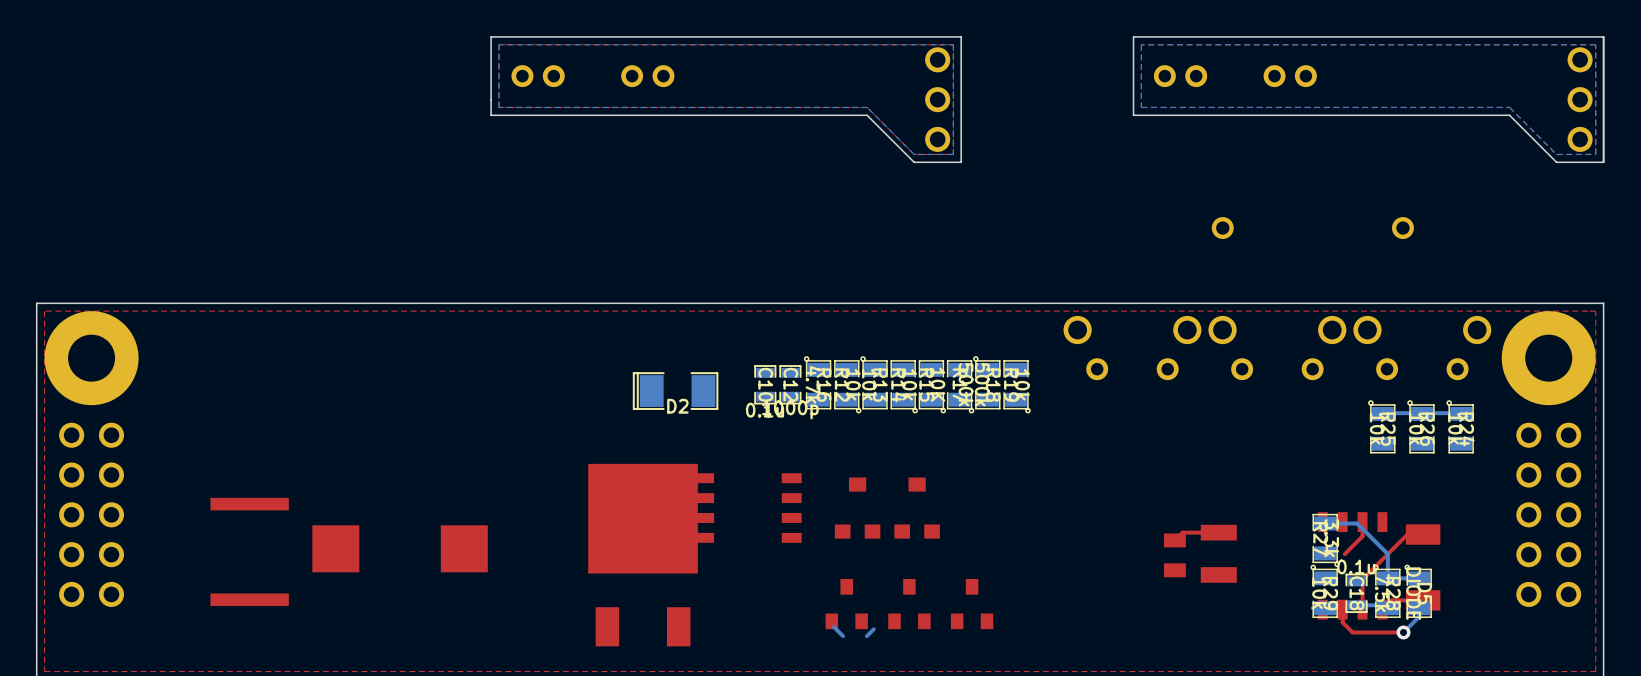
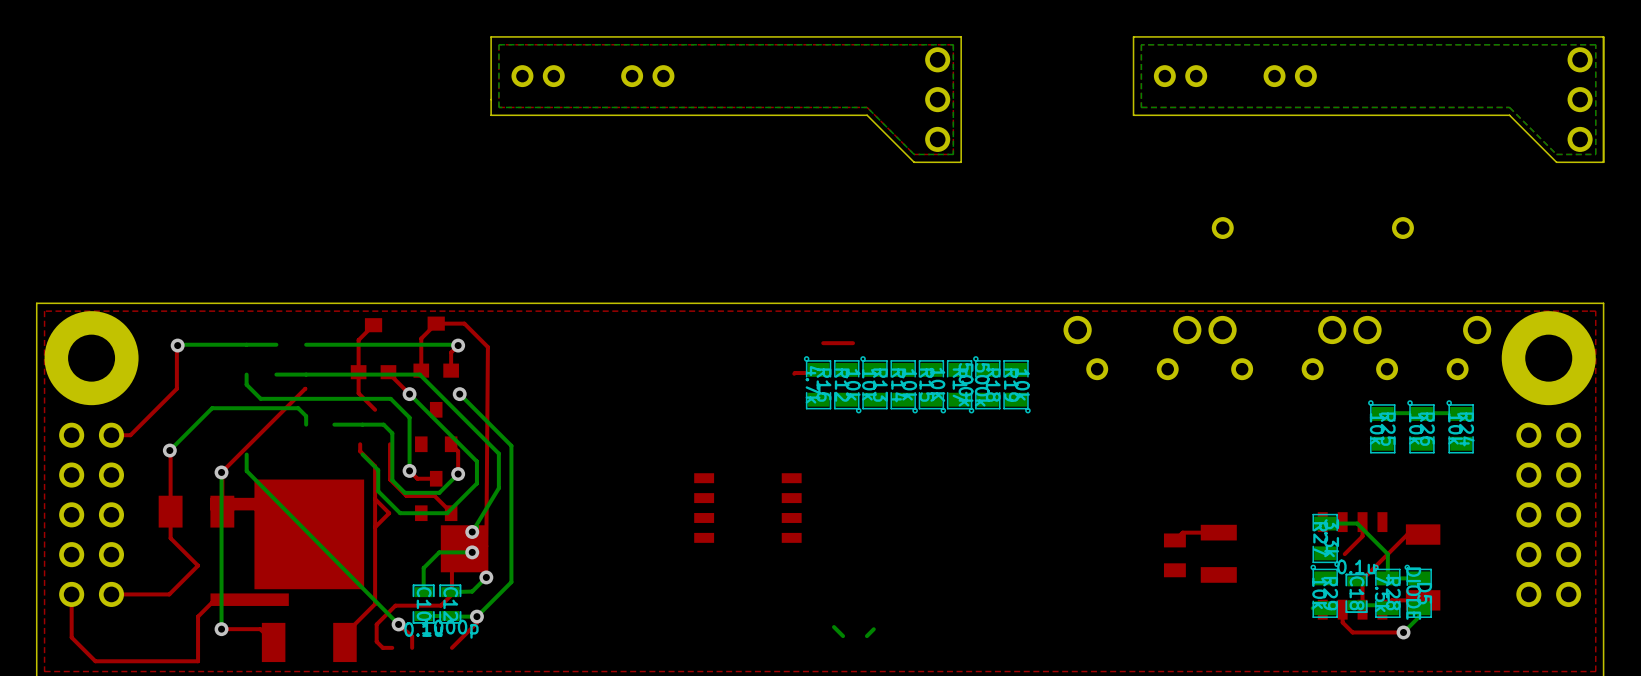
top track: none -> (373, 325) (358, 340) (358, 393) (375, 409)
top track: none -> (852, 343) (823, 343)
bottom track: none -> (276, 344) (177, 345)
bottom track: none -> (306, 344) (458, 345)
top track: none -> (177, 345) (176, 388) (130, 435) (111, 435)
via: none -> (177, 345)
top track: none -> (458, 345) (451, 352) (451, 370)
via: none -> (458, 345)
part: none -> (436, 347)
part: none -> (373, 348)
top track: none -> (421, 370) (421, 338) (436, 323) (464, 323) (487, 347) (486, 577)
top track: none -> (388, 372) (409, 394)
top track: none -> (823, 373) (794, 373)
bottom track: none -> (246, 374) (246, 384) (260, 398) (390, 398) (409, 417) (409, 470)
bottom track: none -> (276, 374) (419, 374) (498, 453) (498, 488) (472, 532) (476, 527)
C10 position: (765, 384) -> (423, 604)
C12 position: (790, 384) -> (450, 604)
top track: none -> (305, 388) (221, 472) (222, 511)
D2: (675, 391) -> none
bottom track: none -> (409, 394) (476, 461) (476, 483) (447, 513) (400, 513) (378, 491) (378, 470) (362, 454)
via: none -> (409, 394)
bottom track: none -> (459, 394) (511, 445) (511, 582) (476, 616) (420, 616)
via: none -> (459, 394)
bottom track: none -> (306, 424) (306, 416) (298, 408) (212, 408) (169, 450)
bottom track: none -> (334, 424) (383, 424) (392, 433) (392, 480) (404, 492) (439, 492) (458, 474)
part: none -> (436, 427)
top track: none -> (360, 444) (360, 451) (375, 466) (375, 604) (344, 634) (344, 642)
top track: none -> (390, 444) (390, 479) (406, 495) (434, 495) (451, 513)
top track: none -> (451, 444) (458, 451) (458, 474)
top track: none -> (169, 450) (170, 511)
via: none -> (169, 450)
bottom track: none -> (246, 454) (246, 470) (398, 624)
top track: none -> (409, 470) (417, 478) (436, 478)
via: none -> (409, 470)
bottom track: none -> (221, 472) (221, 629)
via: none -> (221, 472)
via: none -> (458, 474)
part: none -> (436, 495)
top track: none -> (375, 499) (389, 513) (375, 527)
part: (857, 508) -> none
part: (917, 508) -> none
part: none -> (196, 511)
top track: none -> (170, 524) (170, 538) (198, 565) (169, 594) (111, 594)
via: none -> (472, 532)
bottom track: none -> (472, 552) (439, 552) (423, 568) (423, 592)
top track: none -> (472, 552) (464, 560) (451, 560) (451, 594) (440, 605) (395, 605) (376, 624) (376, 641) (382, 647) (392, 647)
via: none -> (472, 552)
part position: (643, 555) -> (309, 570)
bottom track: none -> (486, 577) (472, 591) (450, 592)
via: none -> (486, 577)
top track: none -> (71, 594) (71, 637) (95, 661) (198, 661) (198, 616) (212, 602) (241, 602)
part: (846, 604) -> none
part: (909, 604) -> none
part: (972, 604) -> none
top track: none -> (476, 616) (476, 622) (451, 647)
via: none -> (476, 616)
top track: none -> (398, 624) (412, 636) (412, 647)
via: none -> (398, 624)
top track: none -> (221, 629) (260, 629) (273, 642)
via: none -> (221, 629)

